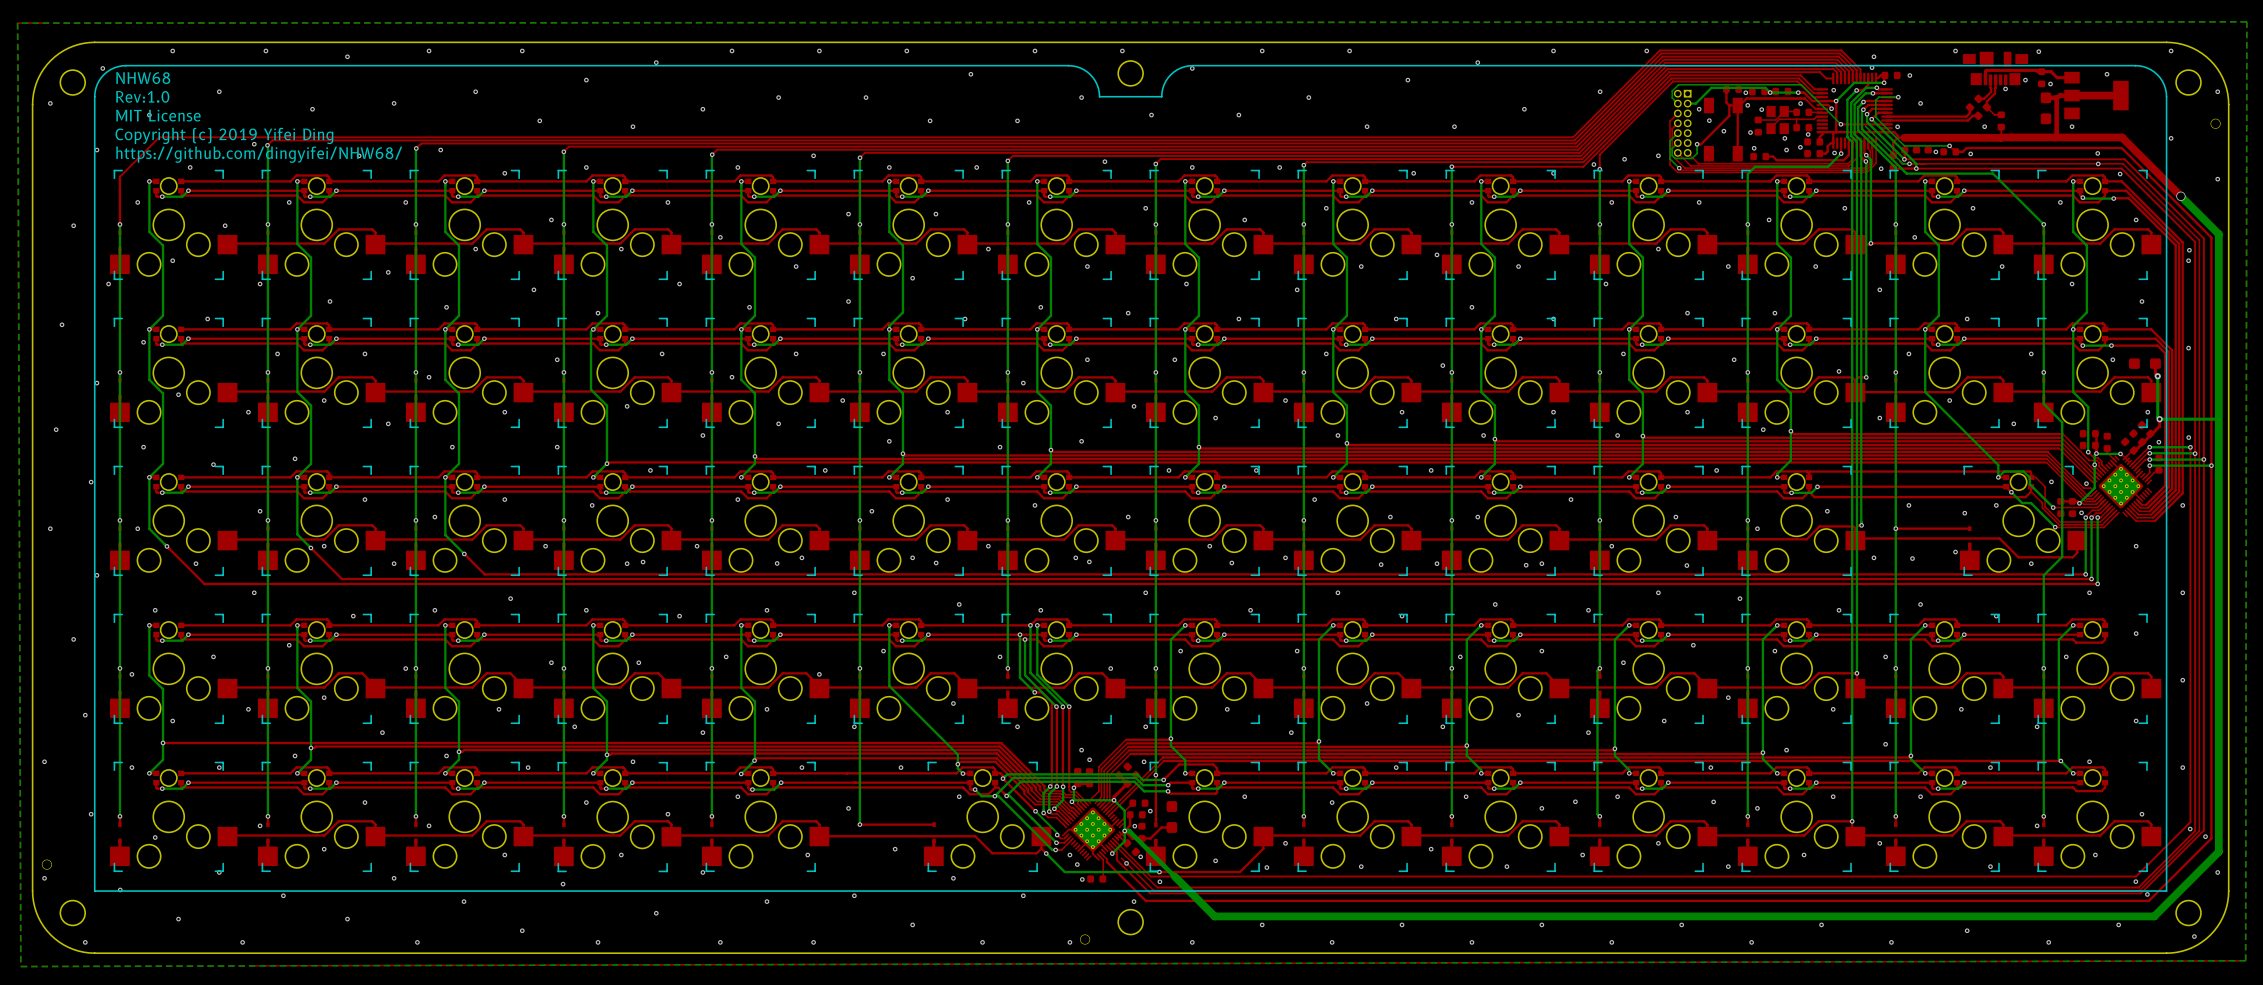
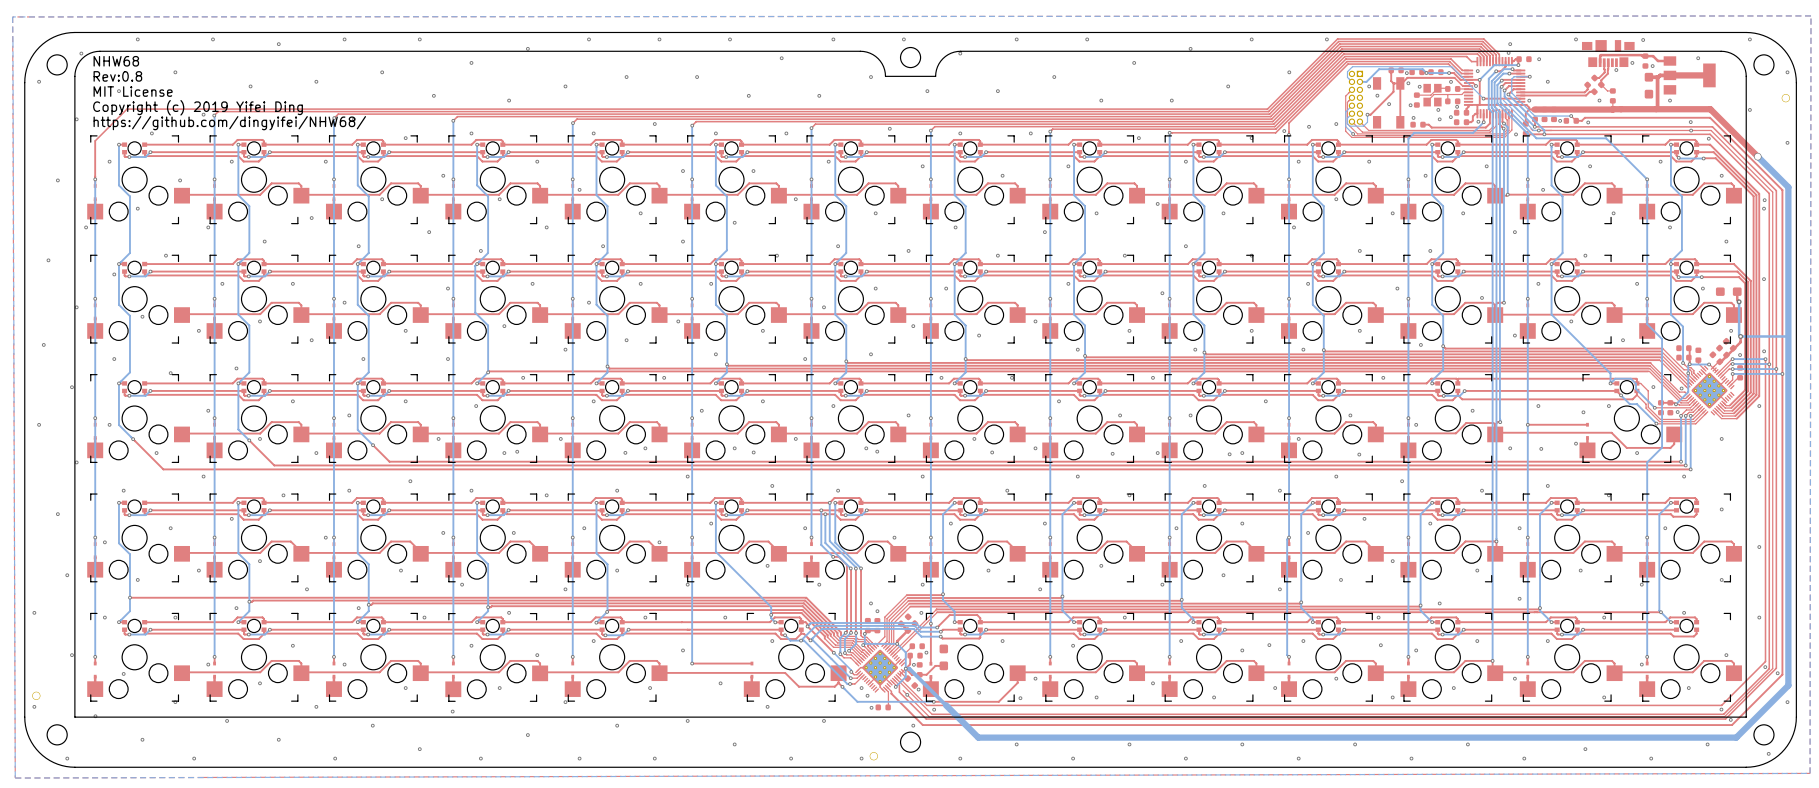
text: Rev:1.0 (142, 96) -> Rev:0.8 (117, 76)

